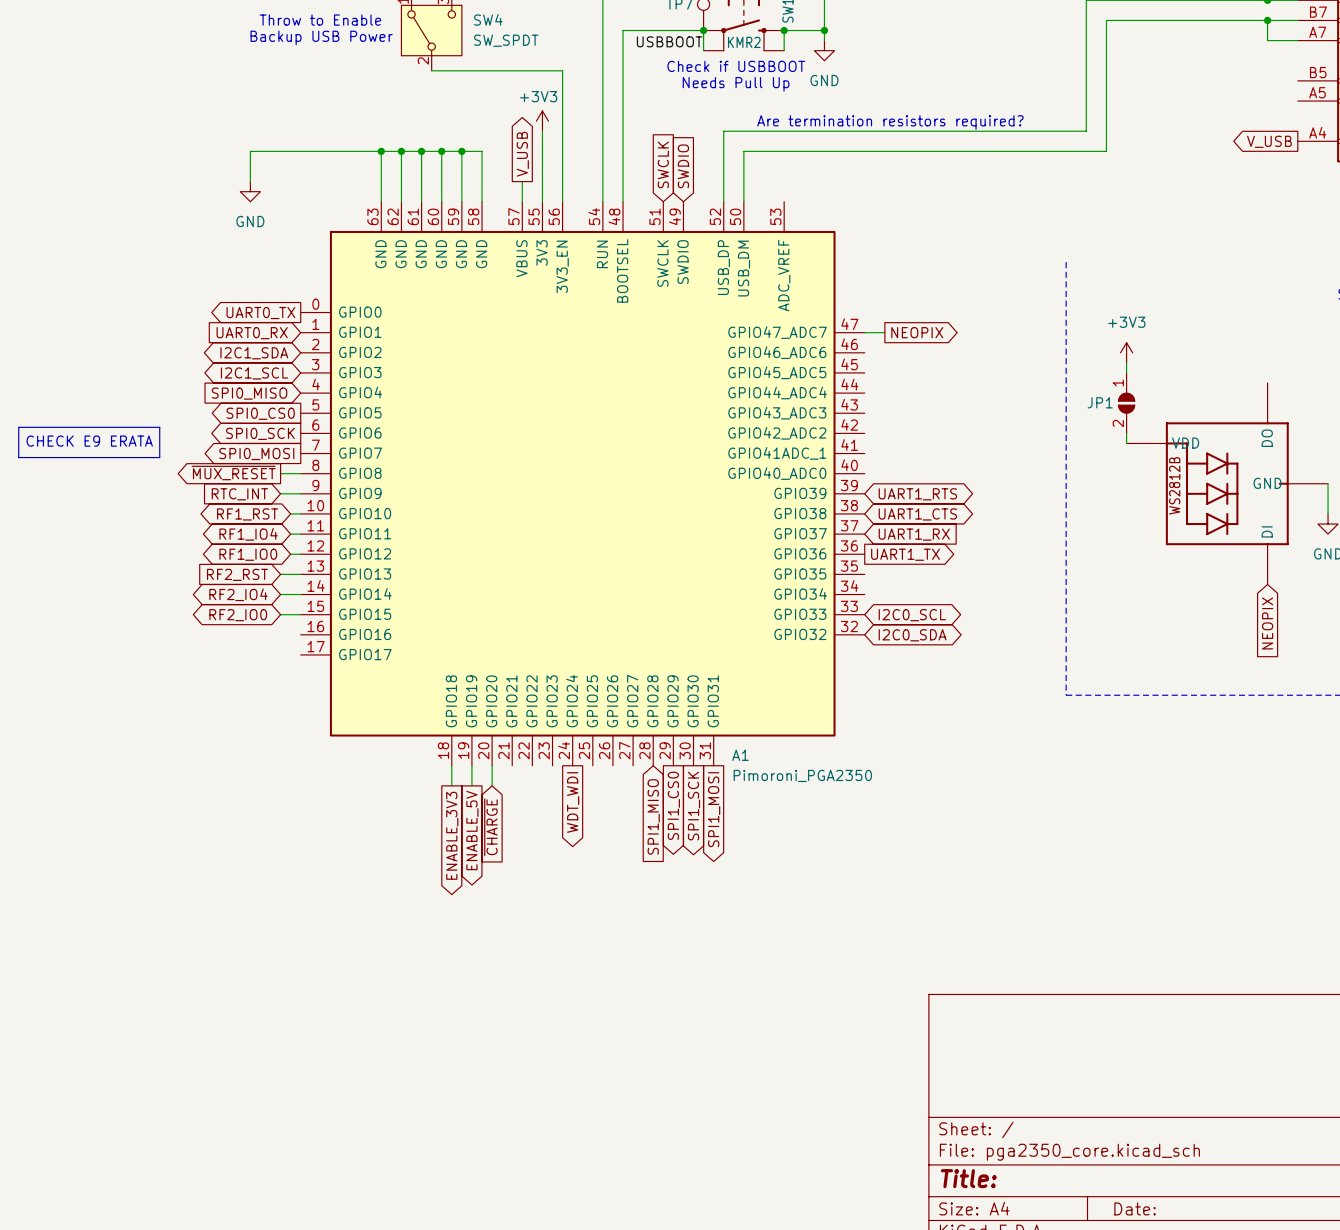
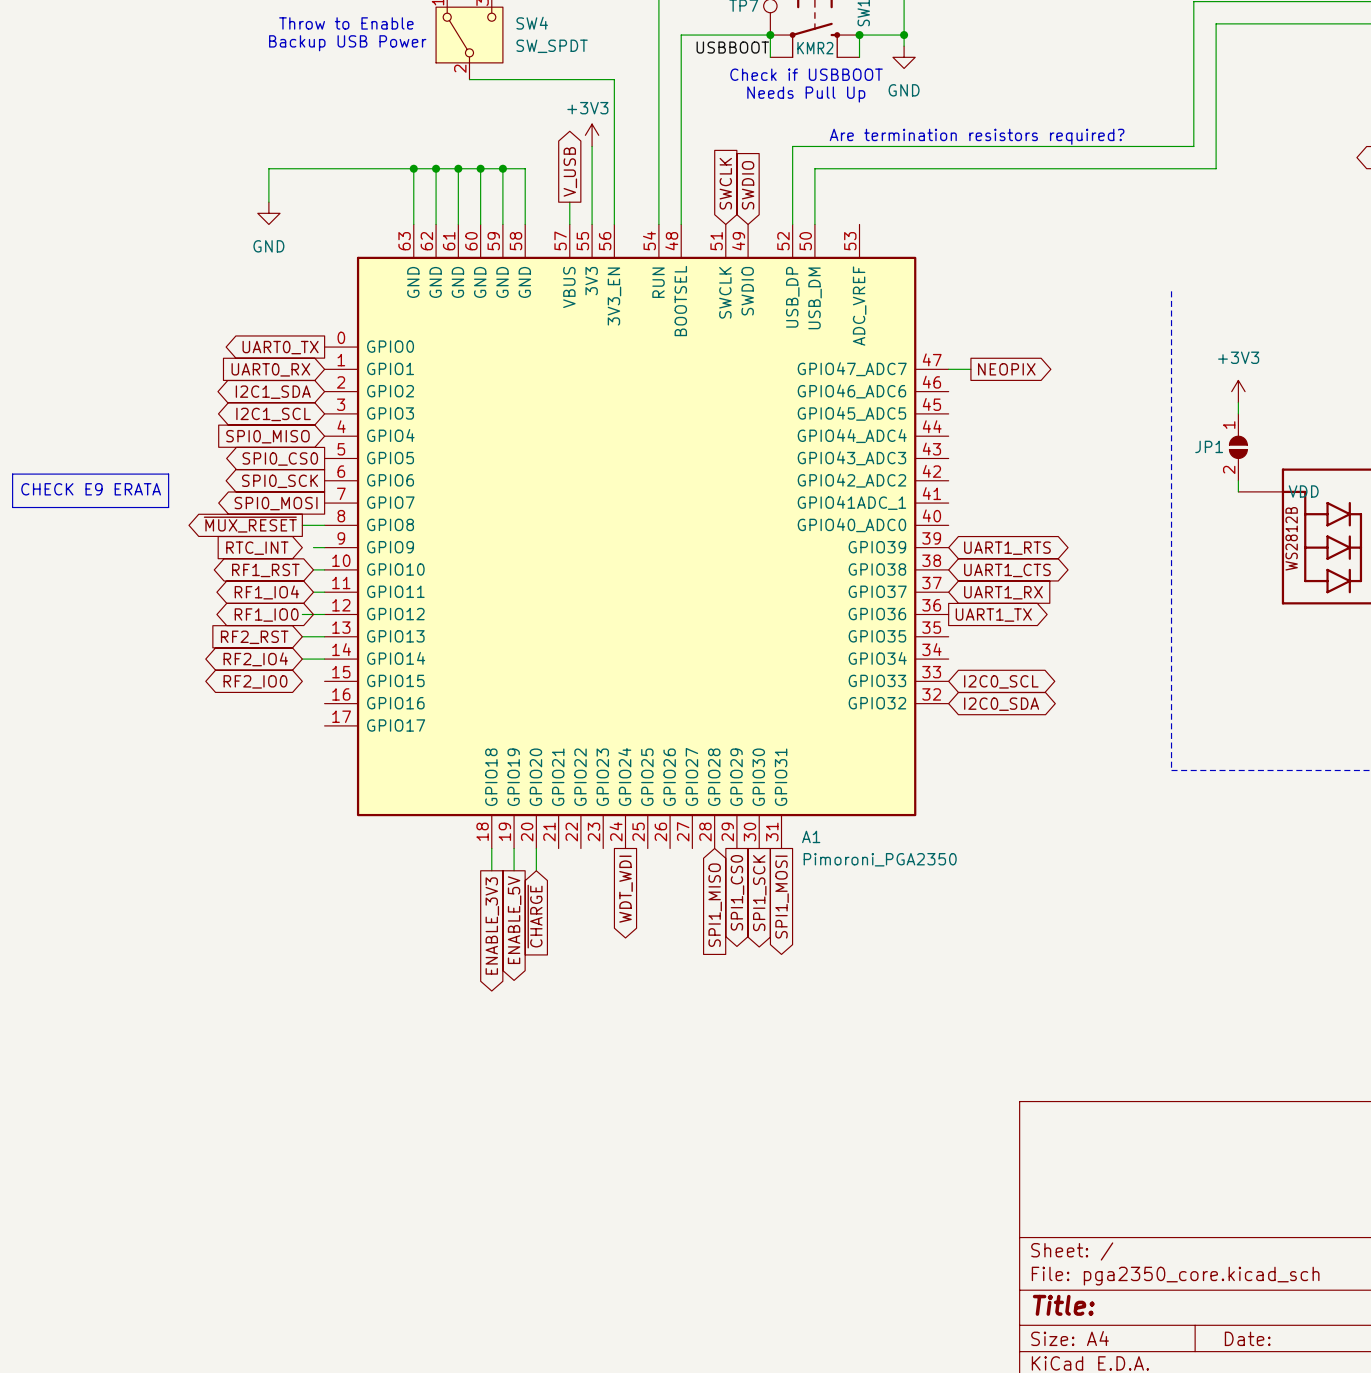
wire: (280, 493) (290, 493) -> (302, 614) (313, 614)
wire: (280, 614) (300, 614) -> none

